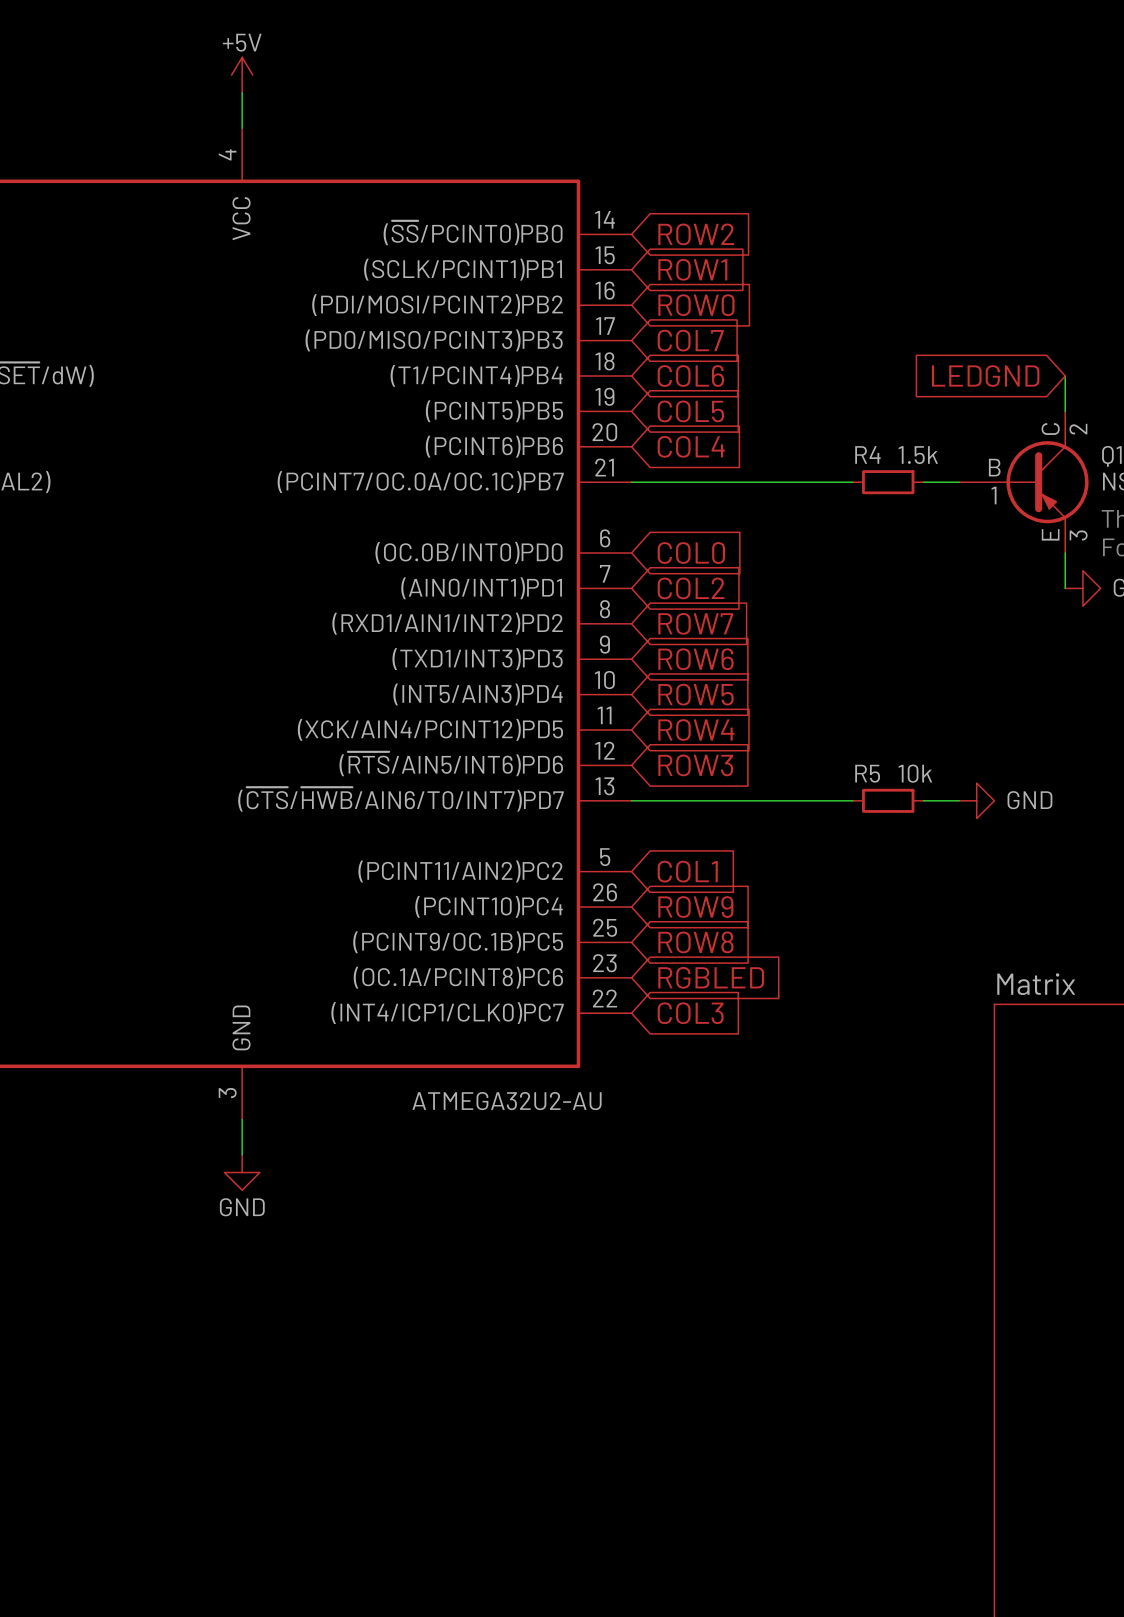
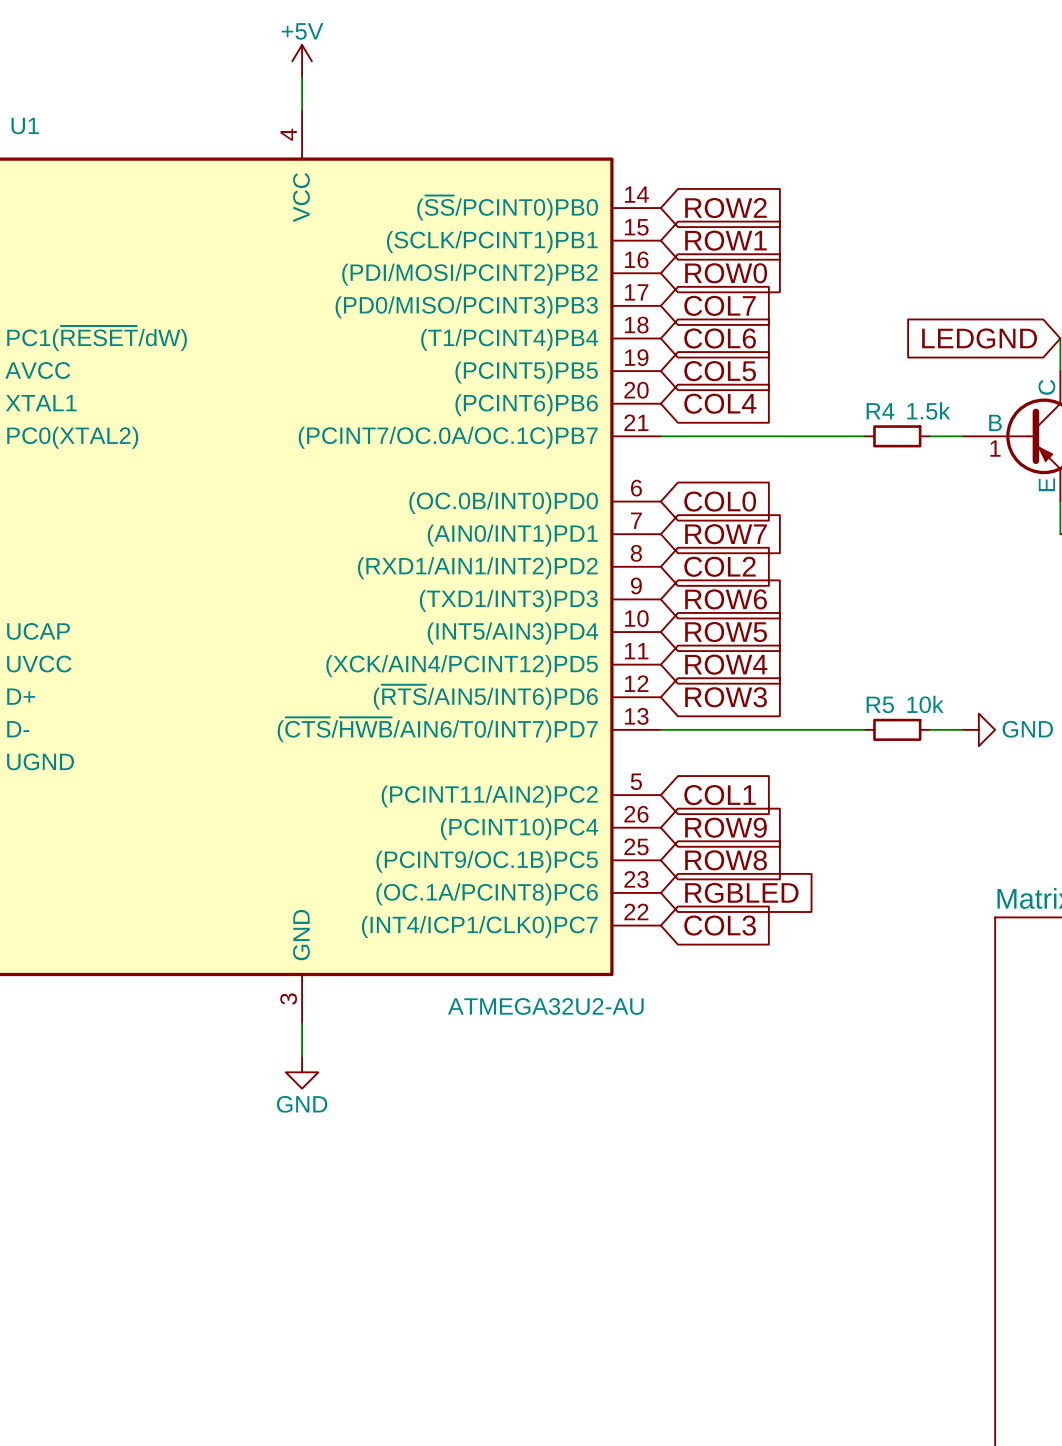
global label: COL2 (691, 588) -> ROW7 (725, 534)
global label: ROW7 (695, 623) -> COL2 (720, 566)

